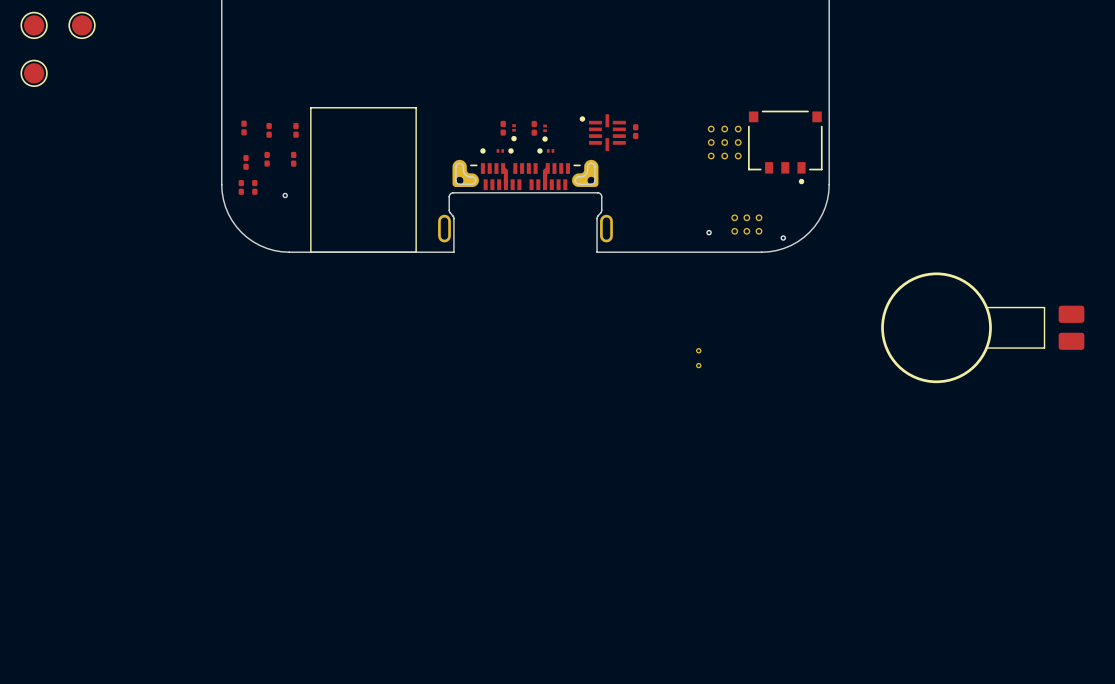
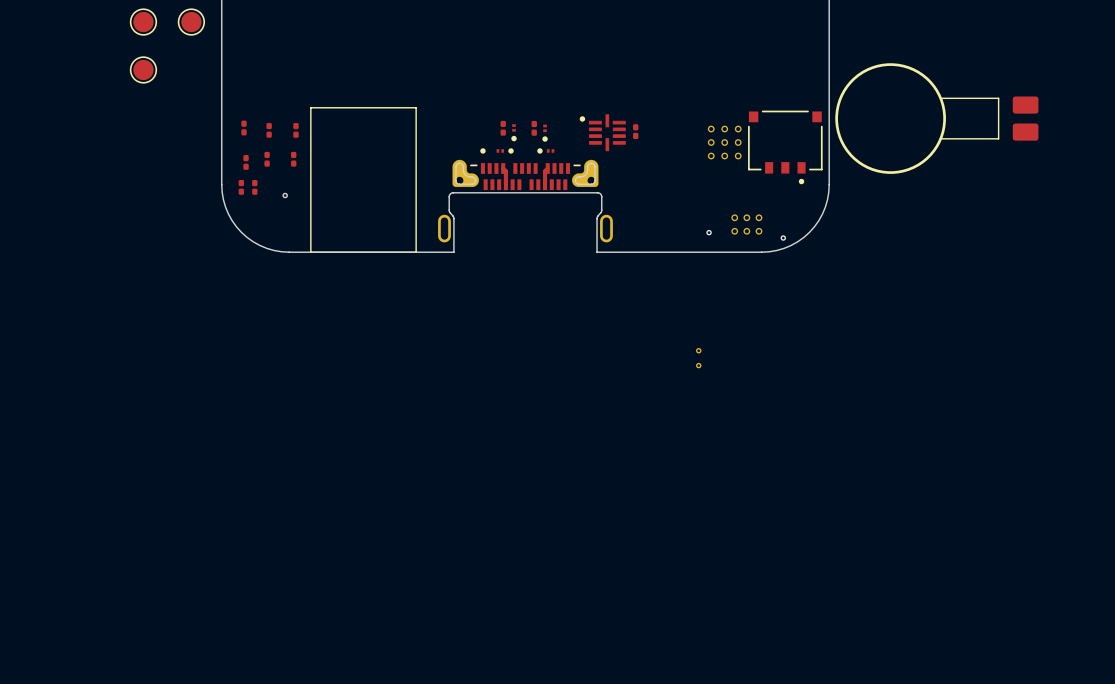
part: none -> (143, 22)
part: none -> (191, 22)
part: (34, 25) -> none
part: (82, 25) -> none
part: none -> (143, 69)
part: (34, 73) -> none
part position: (982, 327) -> (936, 118)

